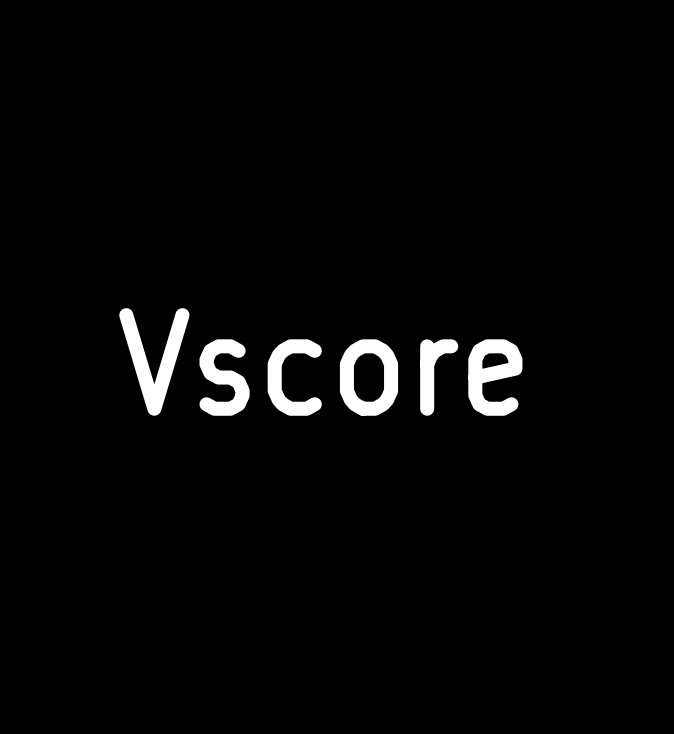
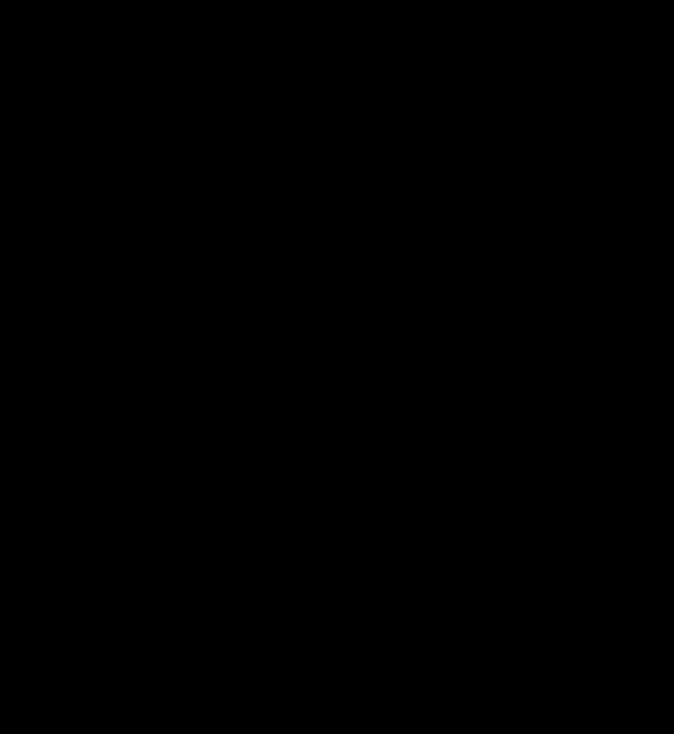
text: Vscore (320, 361) -> none

